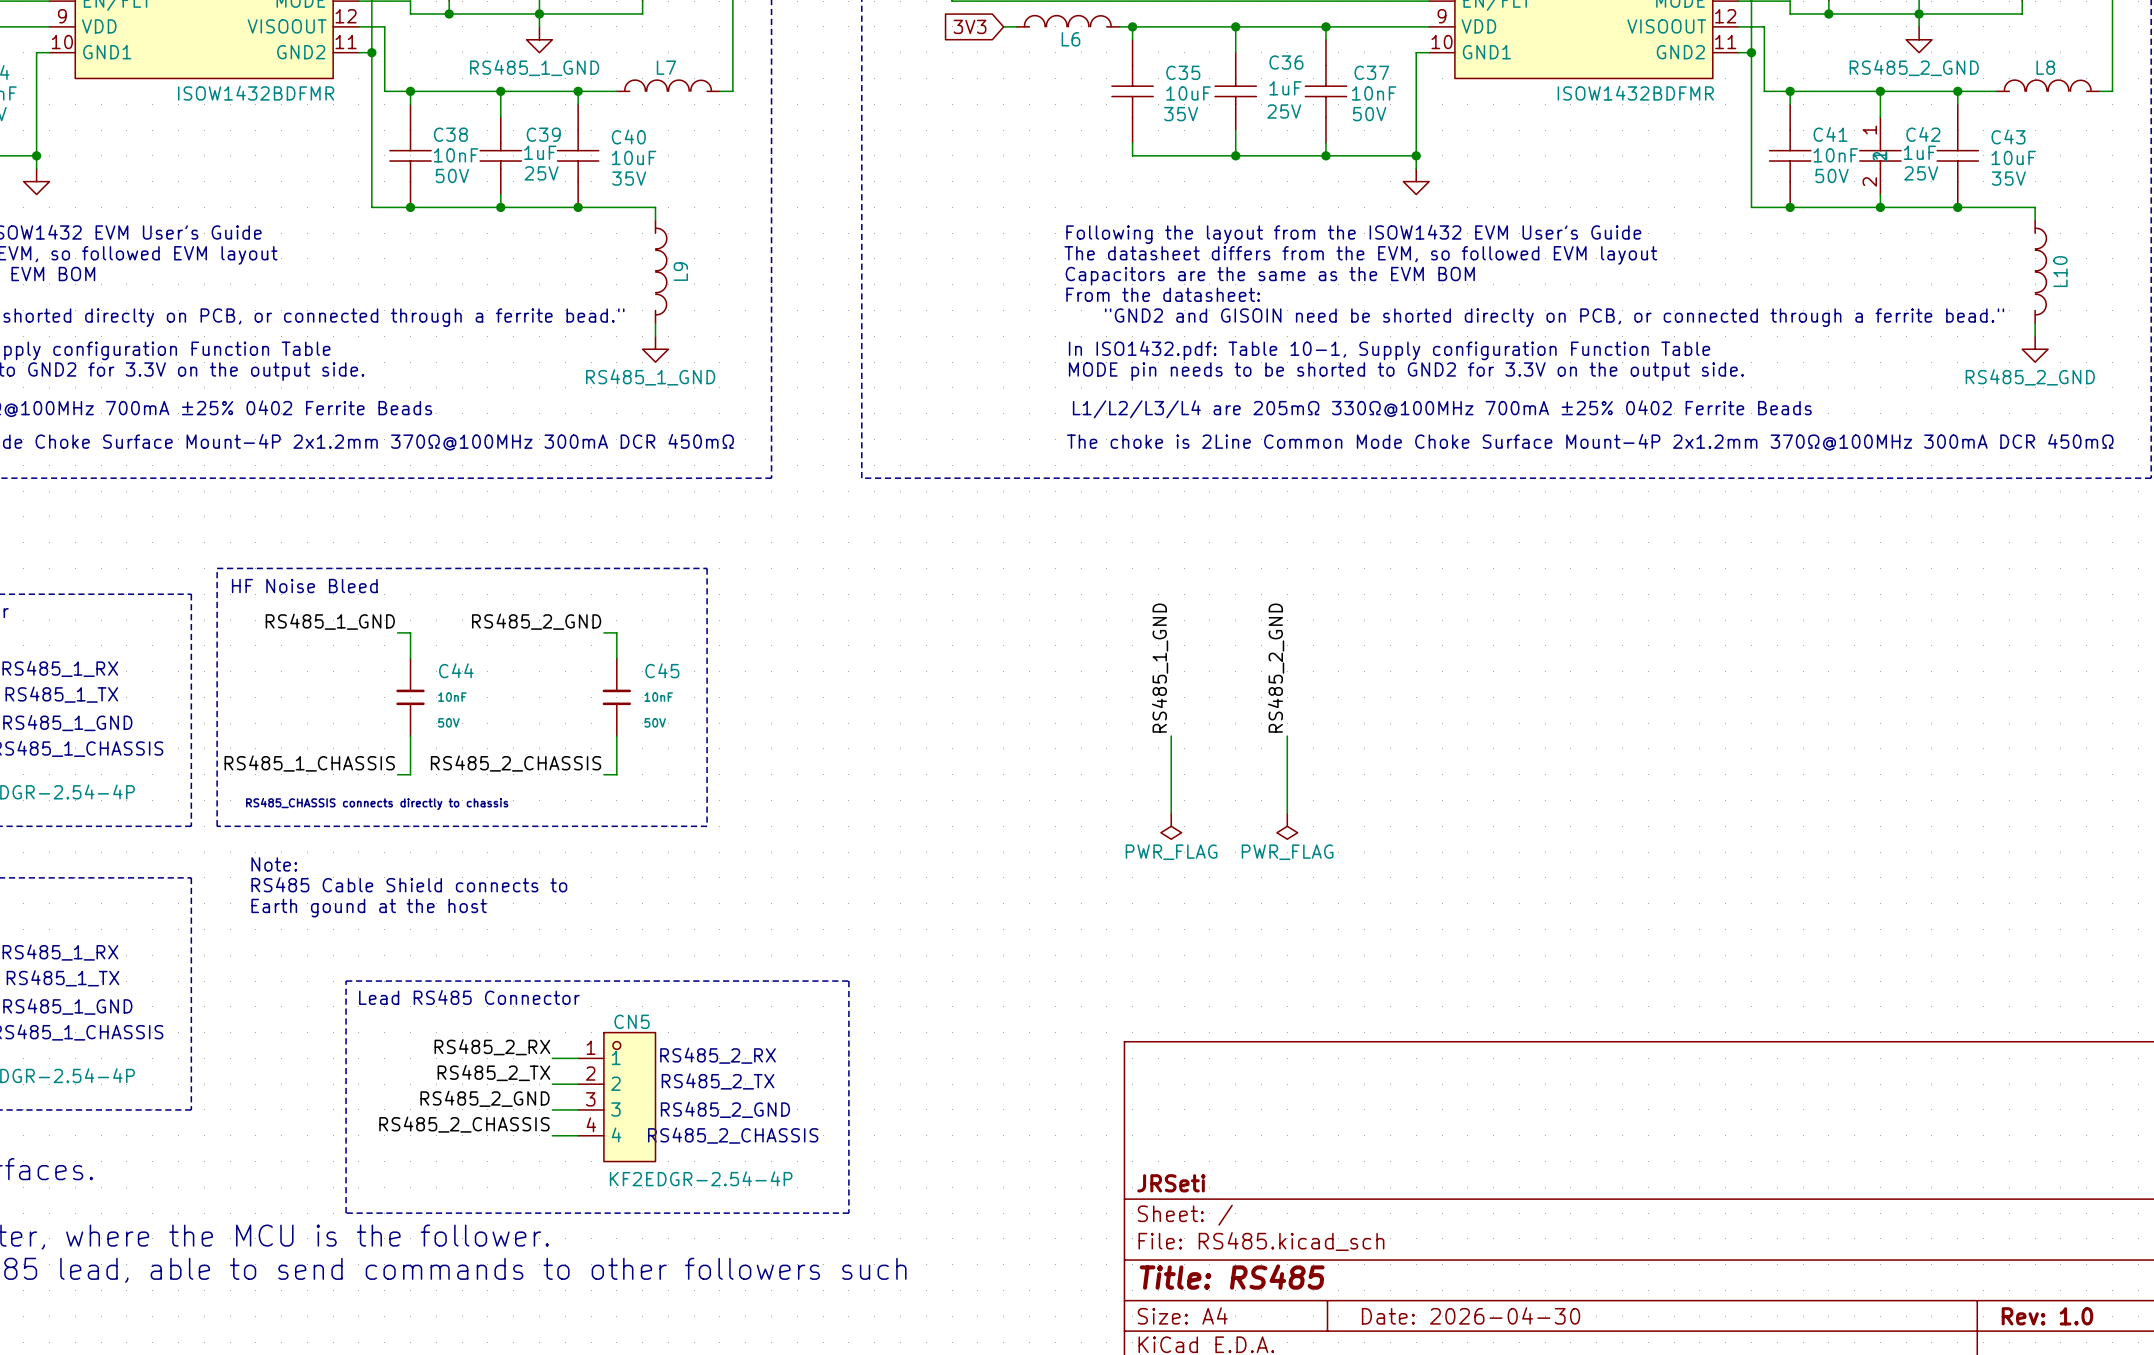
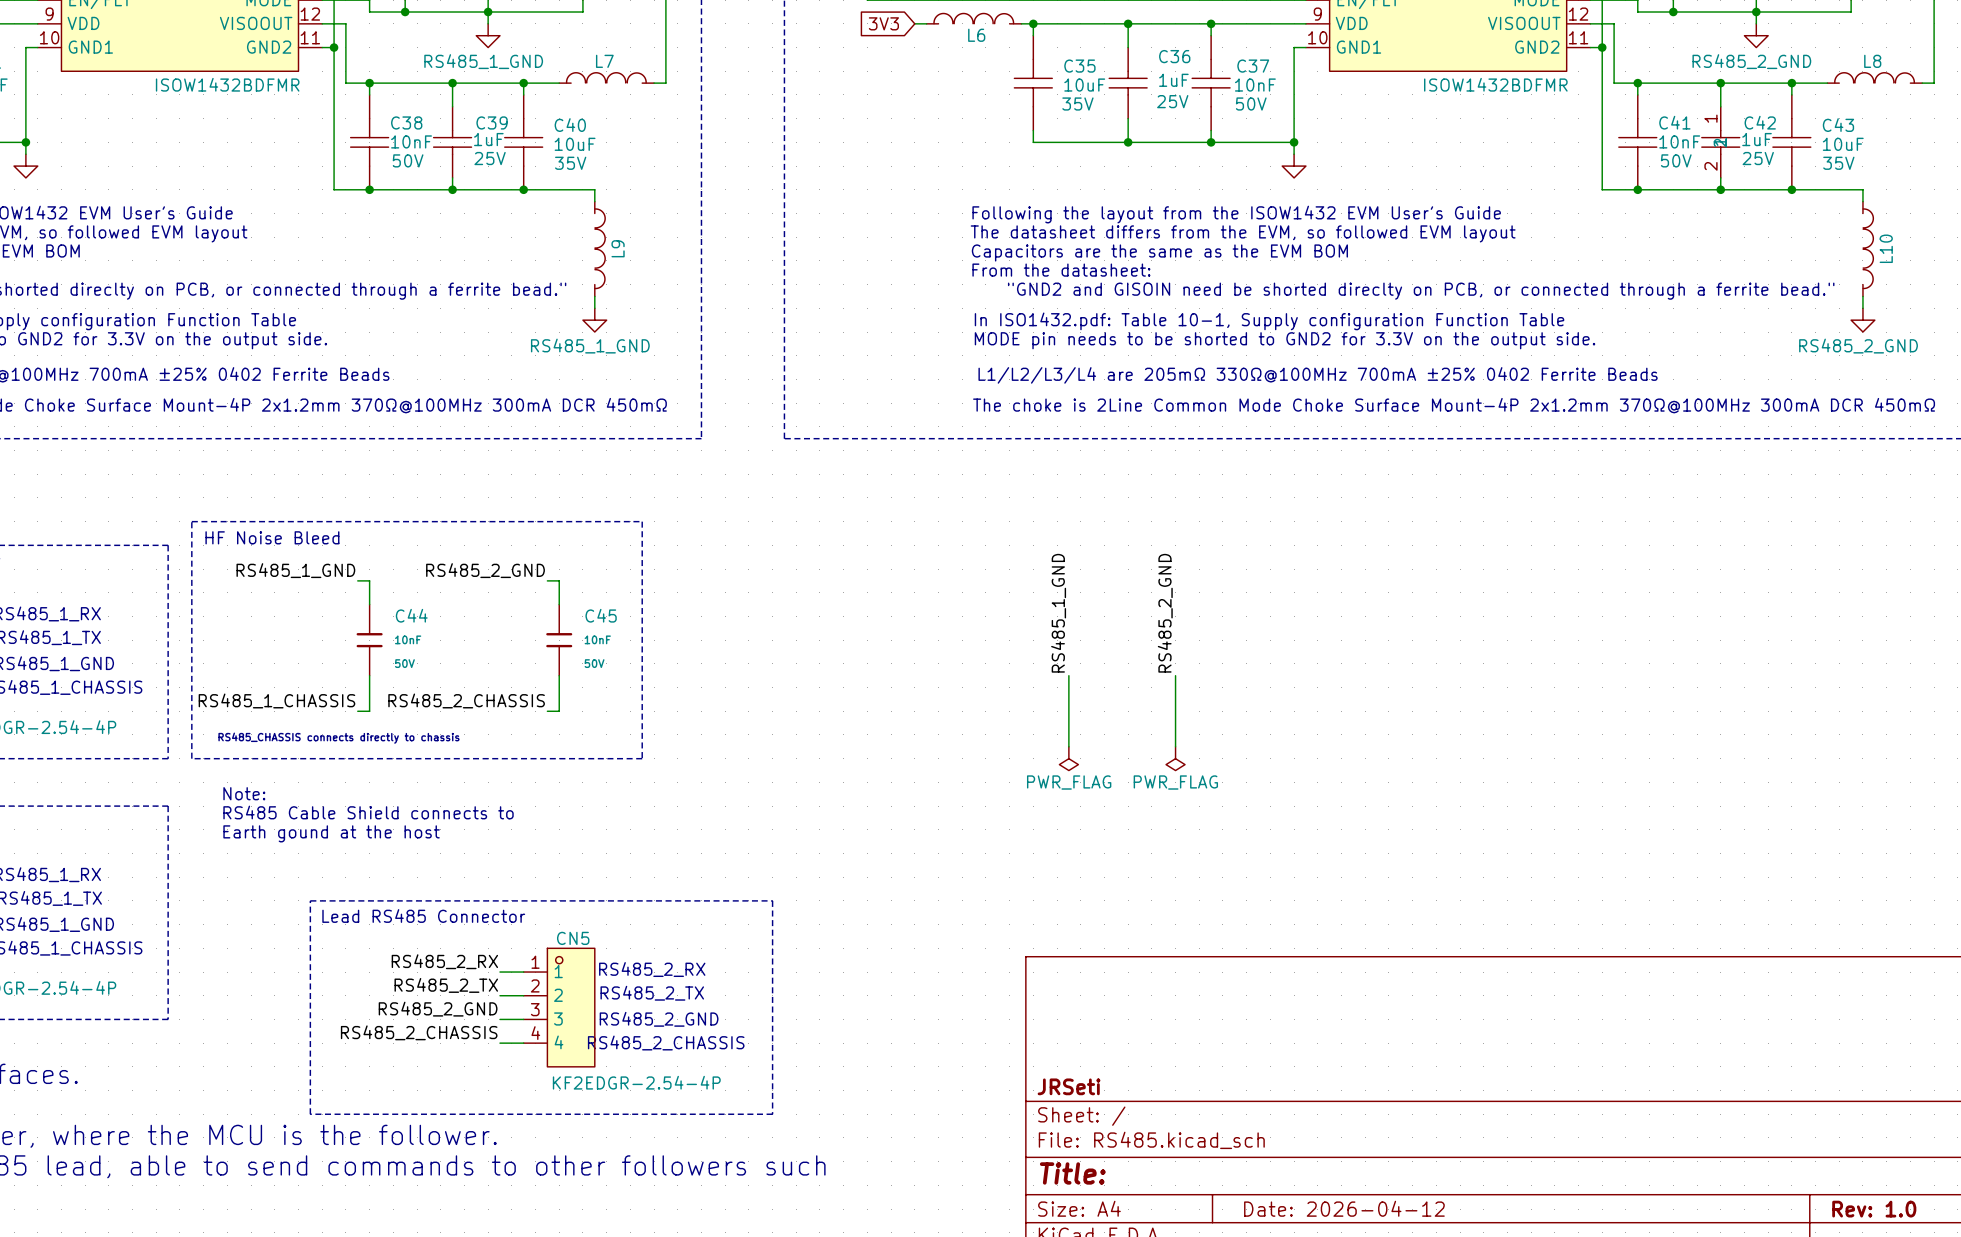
title block: Title: RS485 (1232, 1277) -> Title: (1072, 1173)
title block: Date: 2026-04-30 (1471, 1315) -> Date: 2026-04-12 (1344, 1208)

